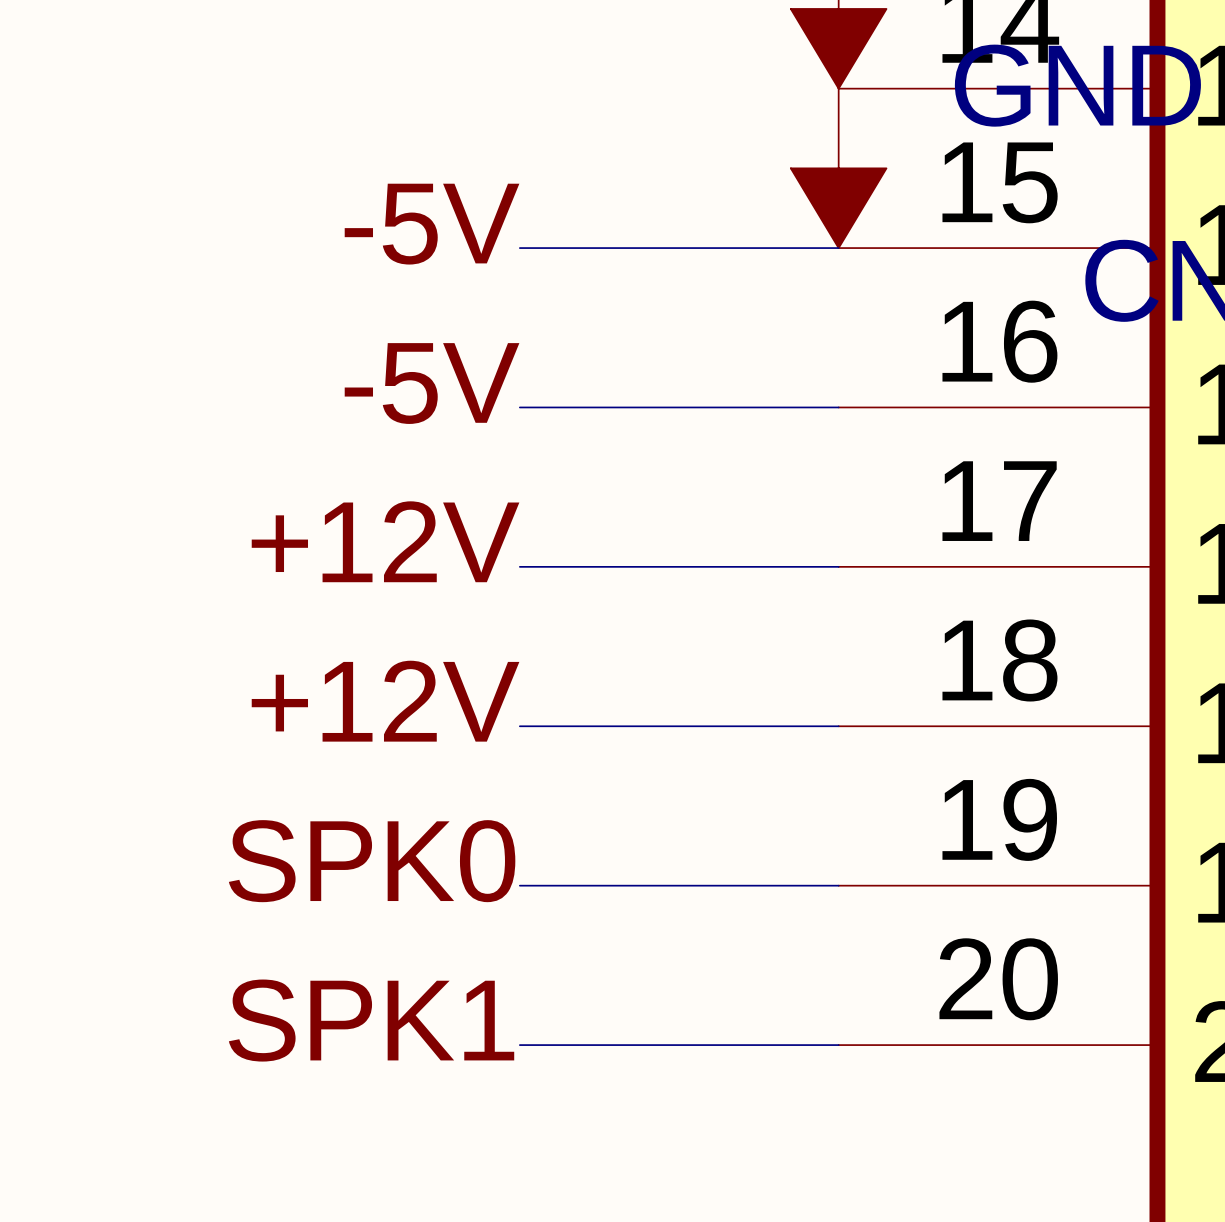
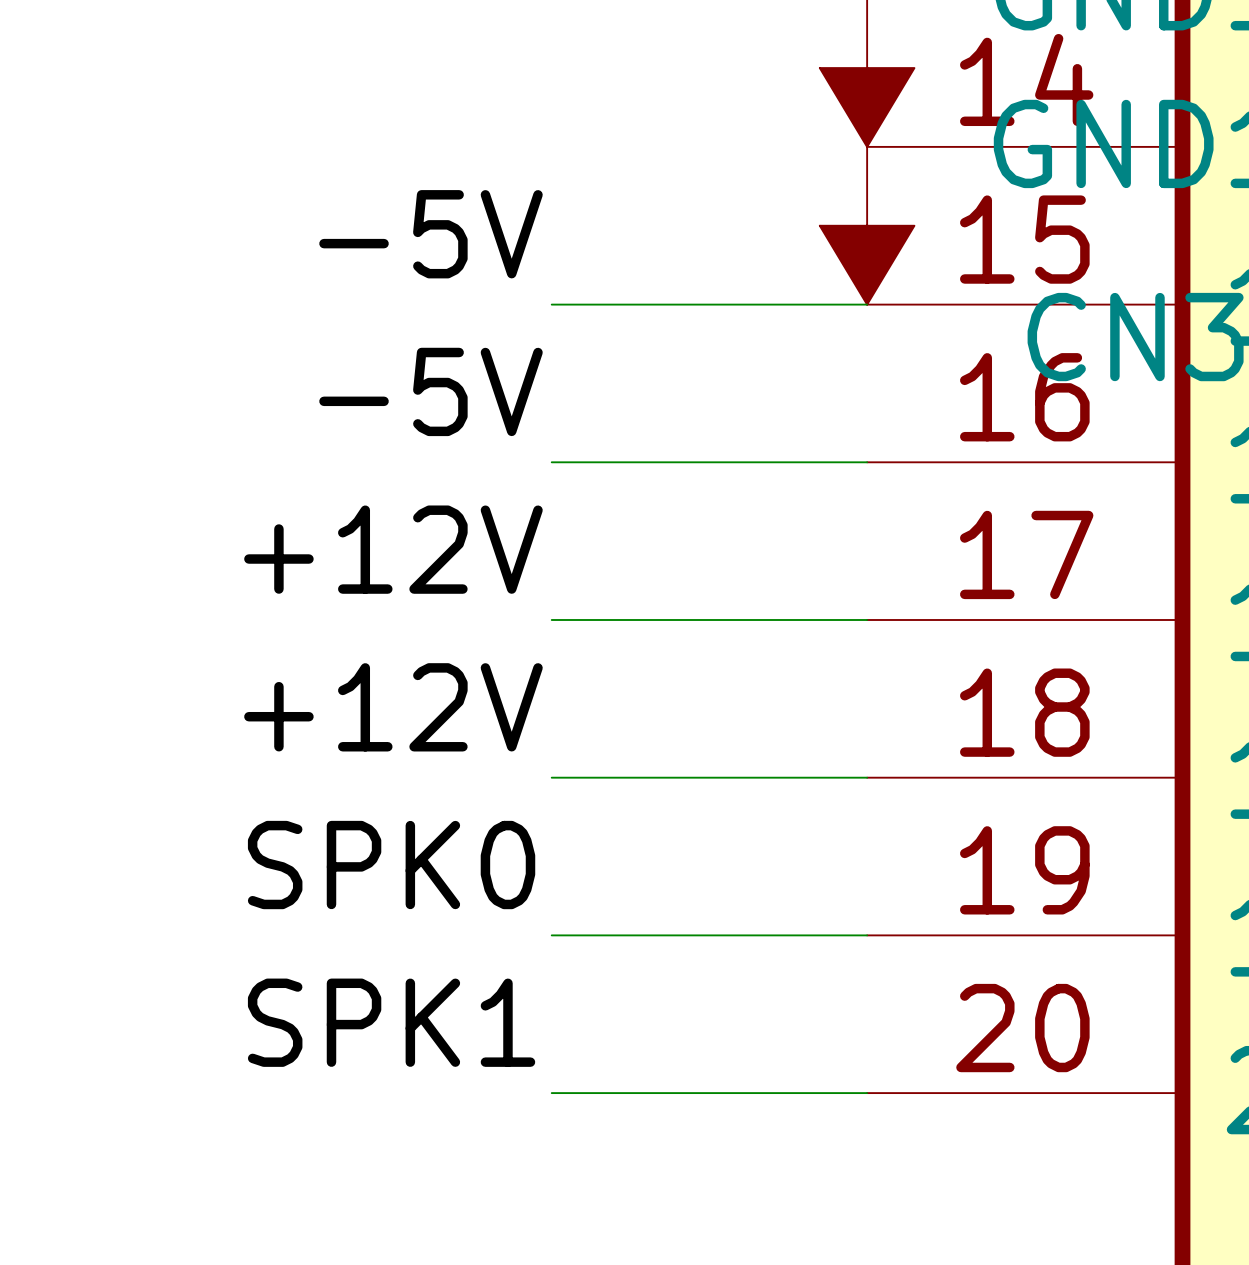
label position: -5V (432, 224) -> -5V (430, 234)
label position: -5V (432, 383) -> -5V (430, 391)
label position: +12V (385, 541) -> +12V (393, 549)
label position: +12V (385, 701) -> +12V (393, 707)
label position: SPK0 (372, 861) -> SPK0 (391, 865)
label position: SPK1 (371, 1020) -> SPK1 (391, 1022)

